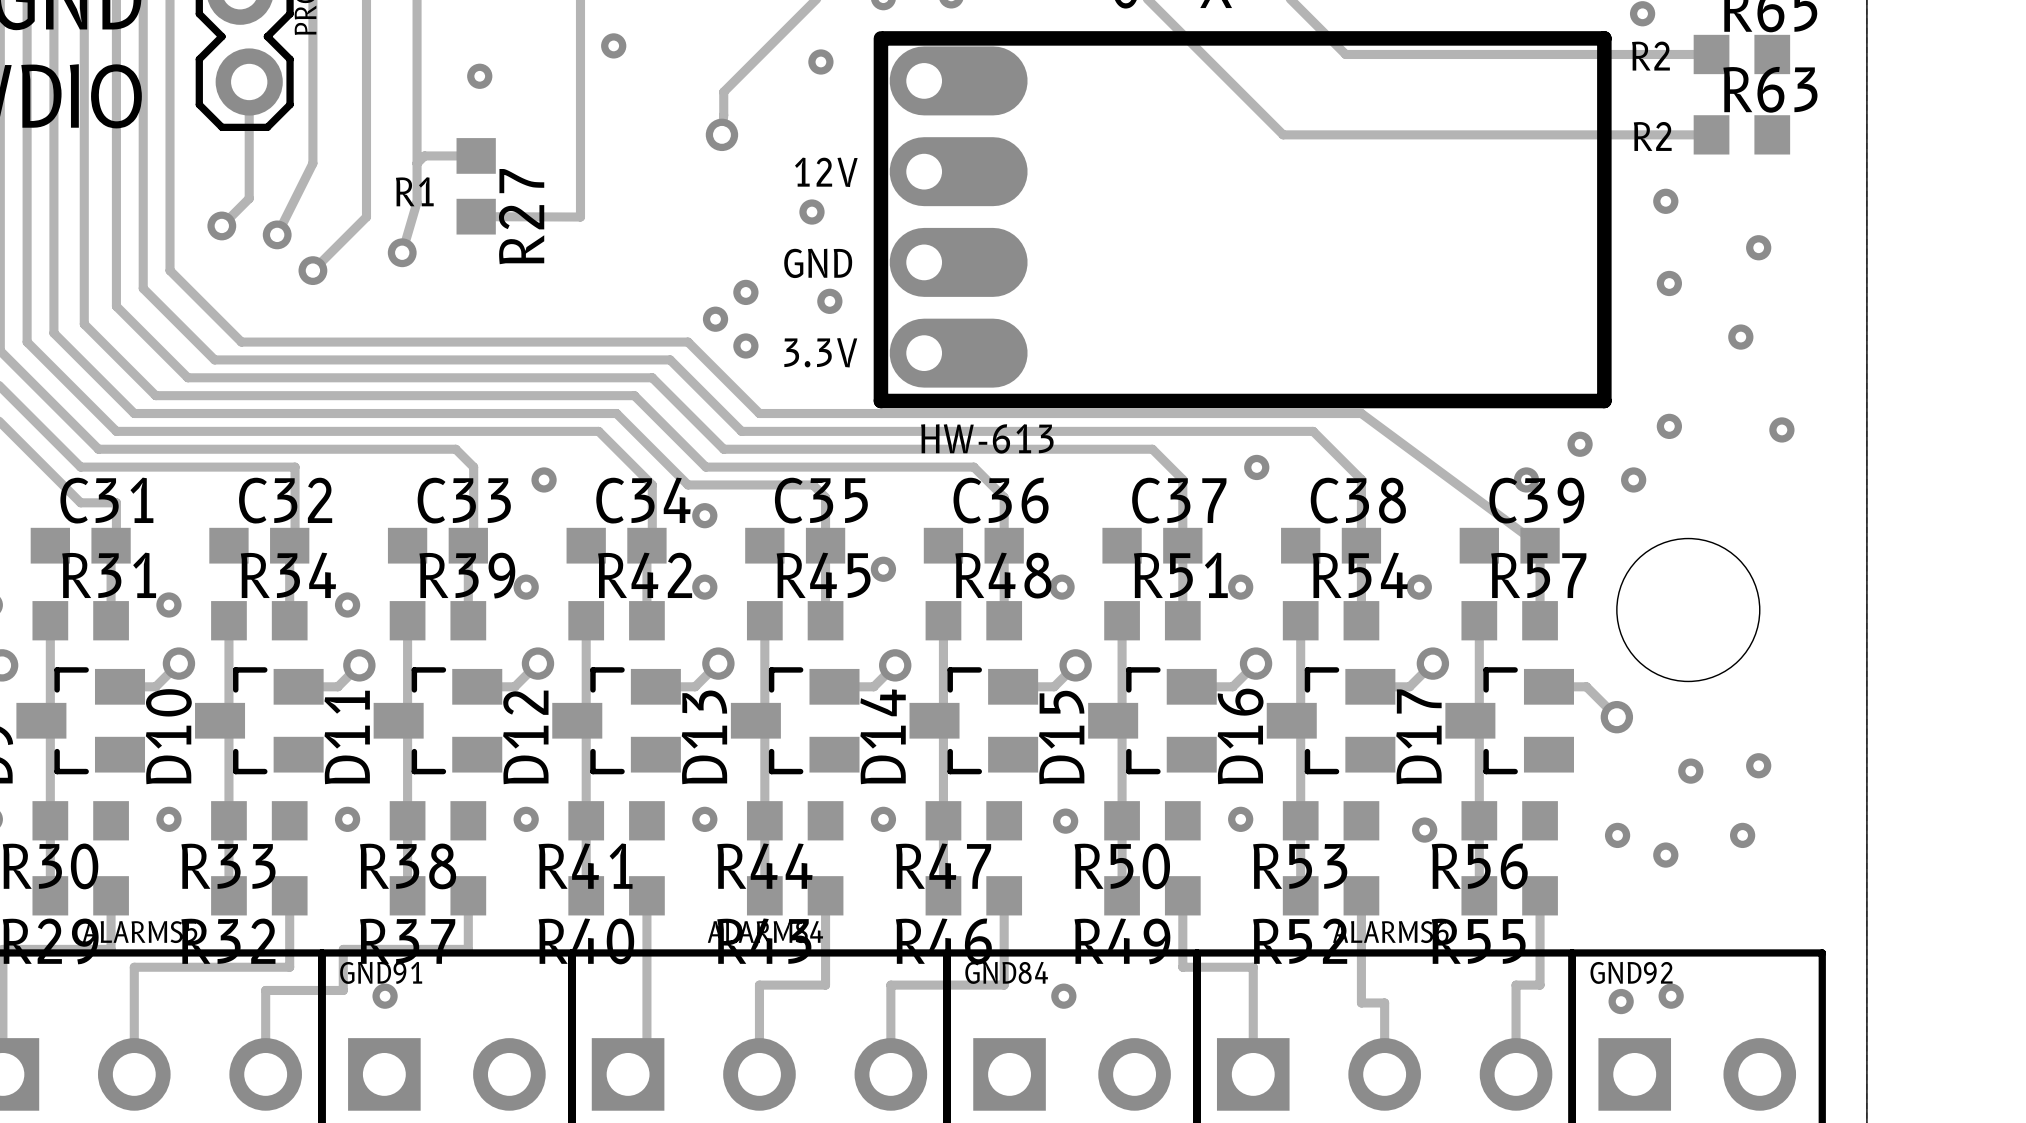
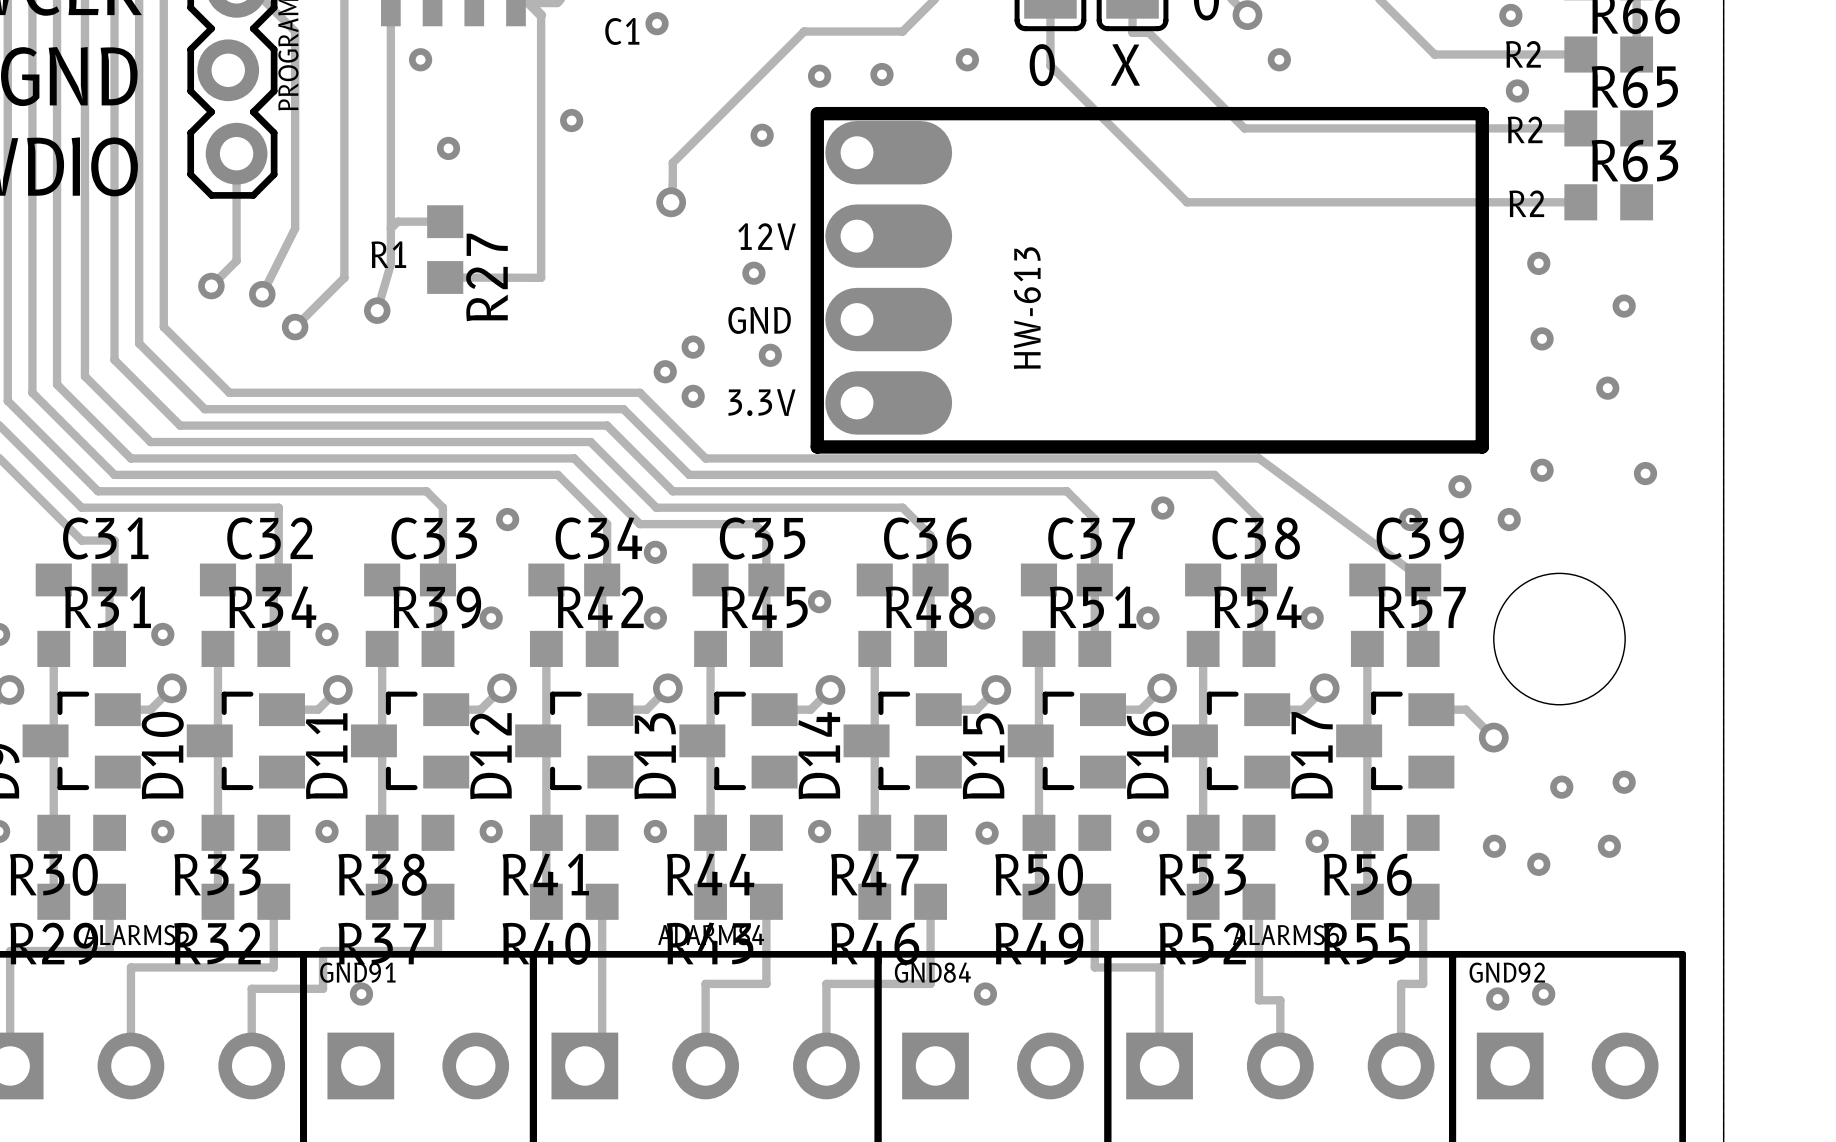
text rotation: 0° (987, 438) -> 90° counterclockwise (1027, 308)
text position: HW-613 (987, 438) -> HW-613 (1027, 308)

